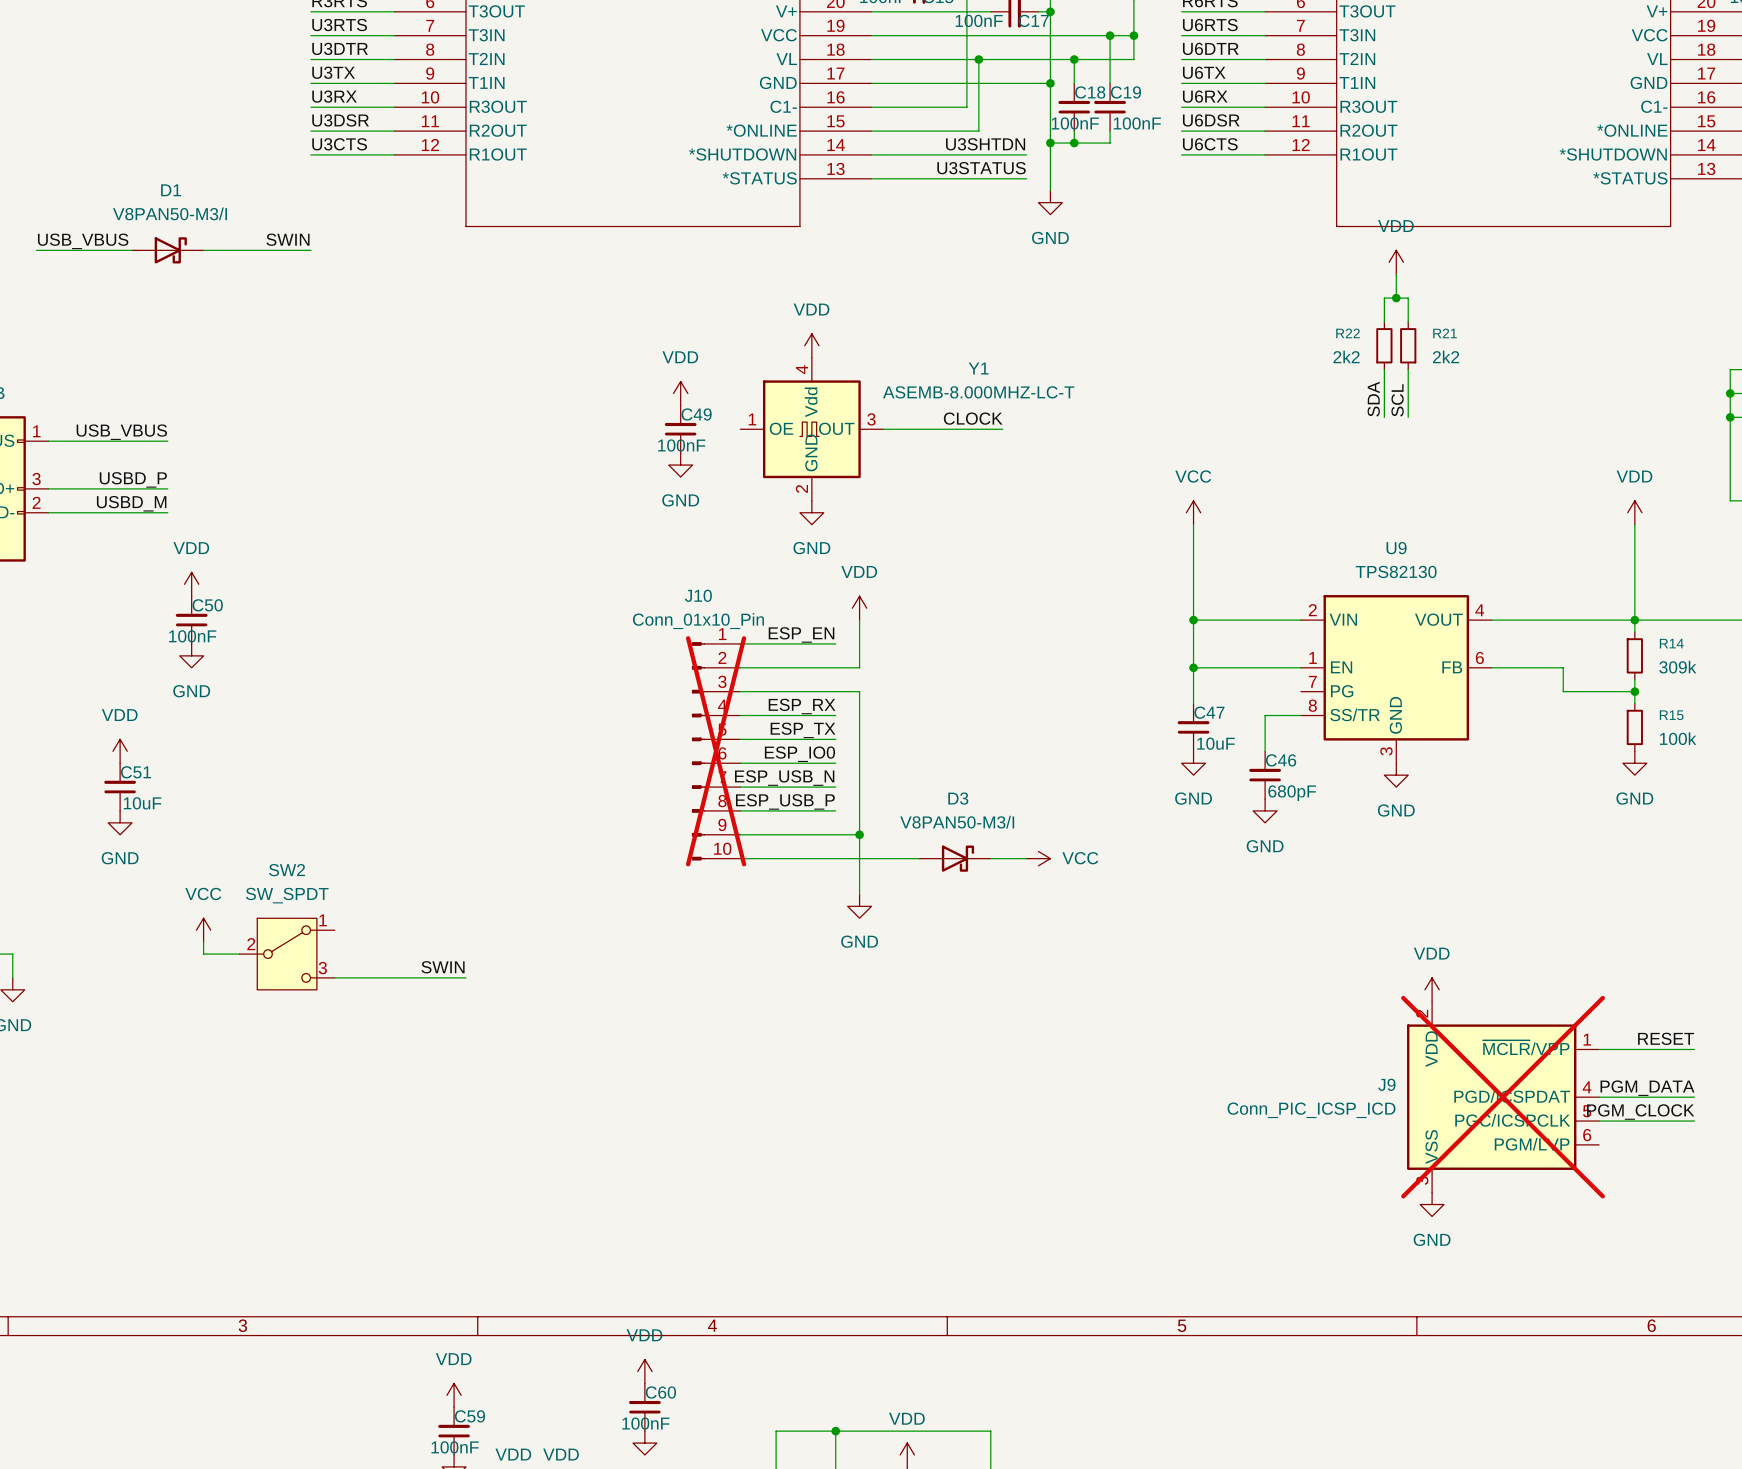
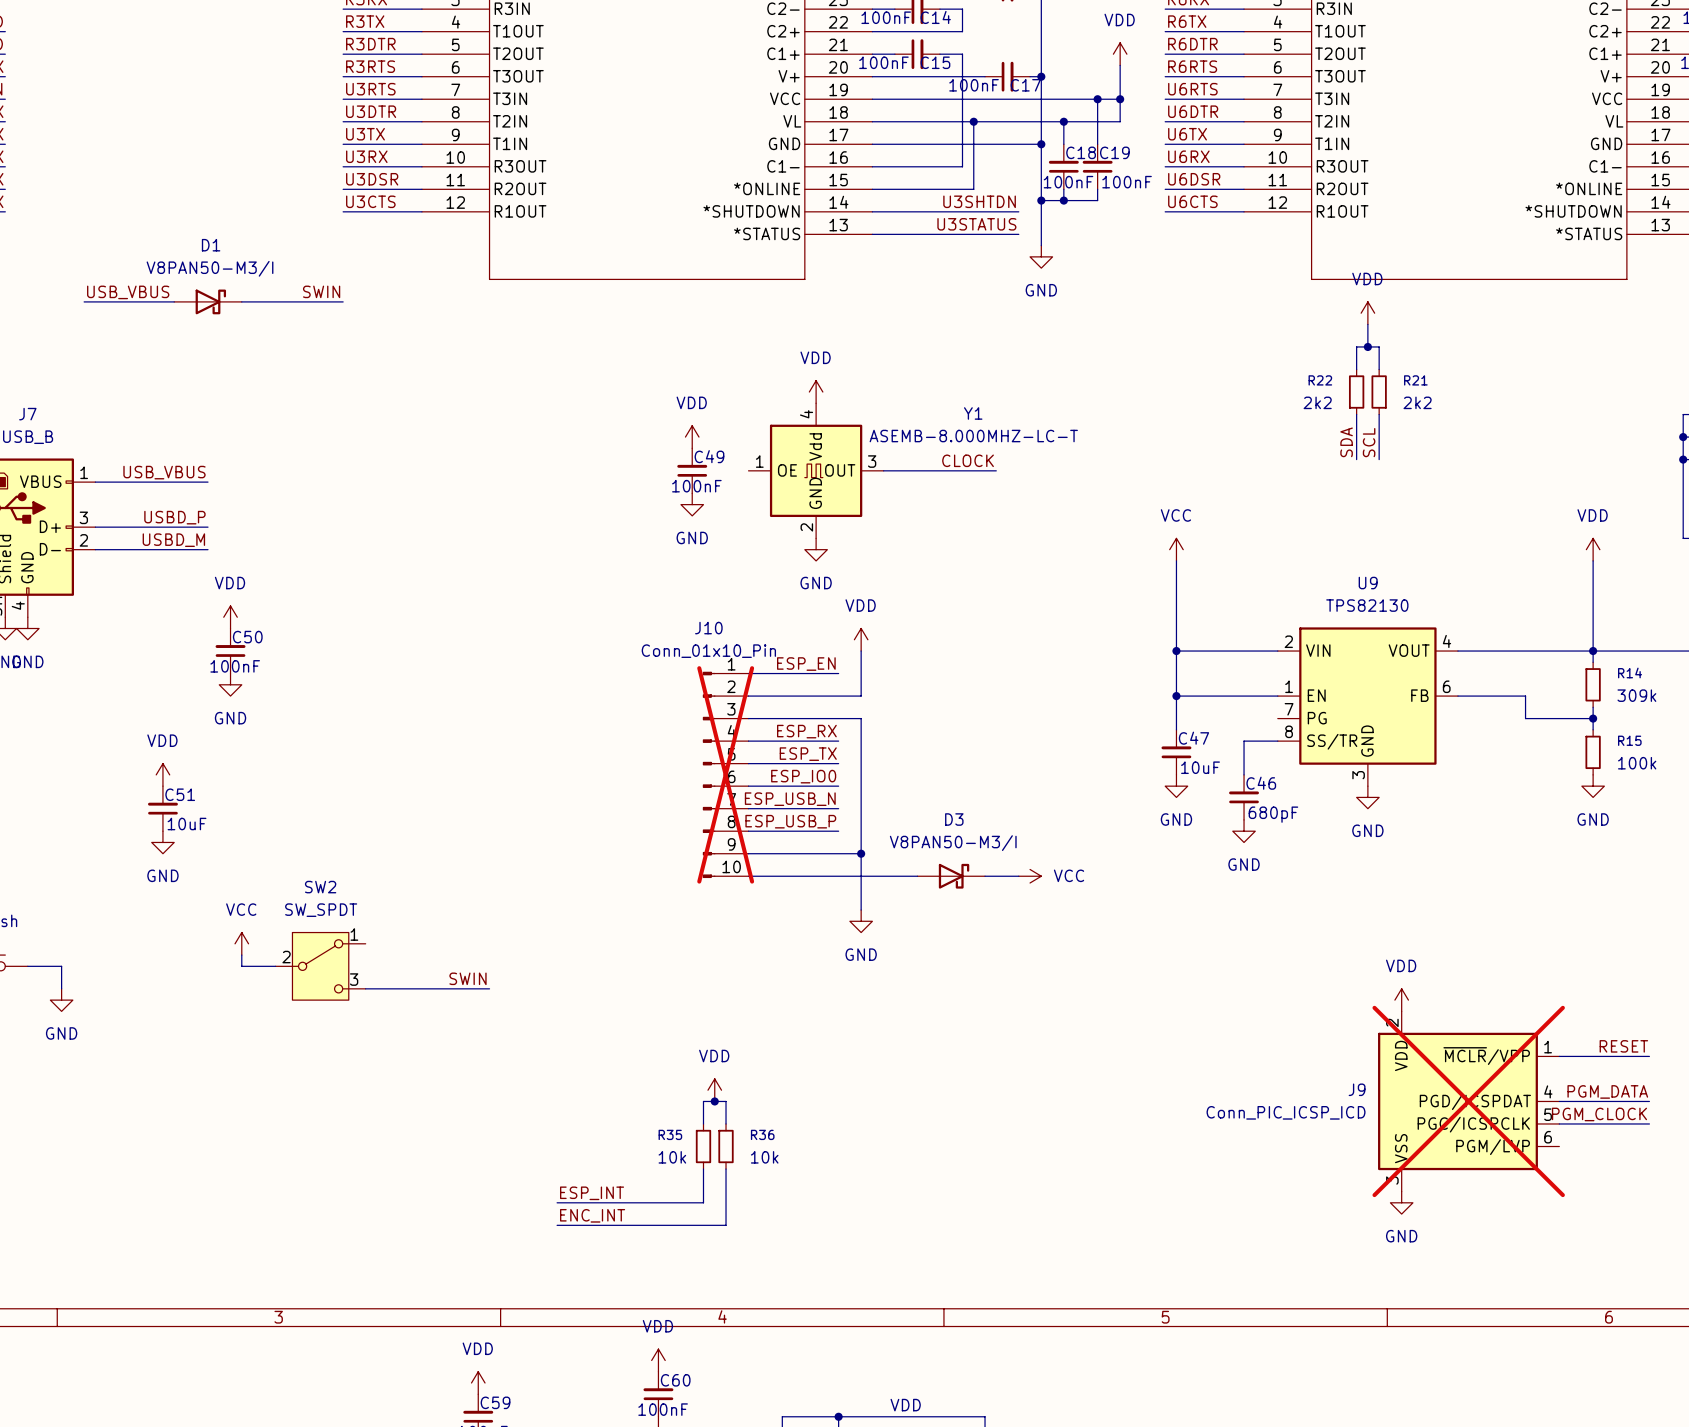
power symbol: none -> VDD (714, 1090)
junction: none -> (714, 1101)
wire: none -> (703, 1123) (703, 1101) (726, 1101) (726, 1123)
R35: none -> 10k (703, 1146)
R36: none -> 10k (726, 1146)
wire: none -> (703, 1169) (703, 1202) (557, 1202)
wire: none -> (726, 1169) (726, 1225) (557, 1225)
label: none -> ESP_INT (592, 1193)
label: none -> ENC_INT (592, 1215)

